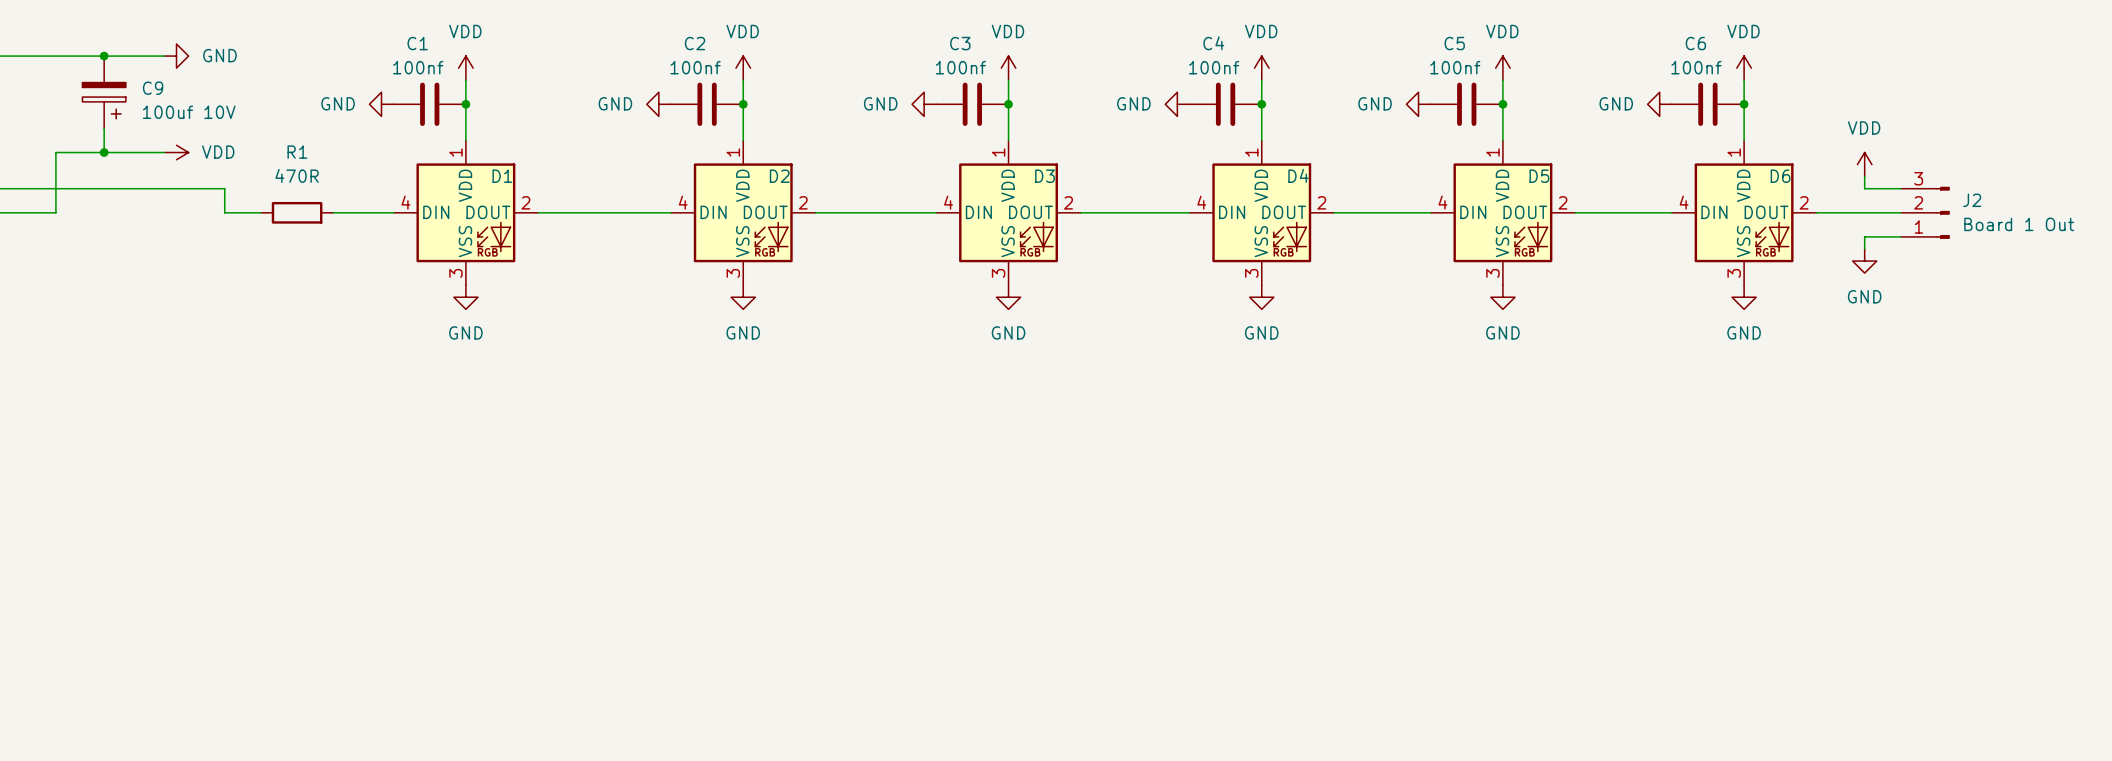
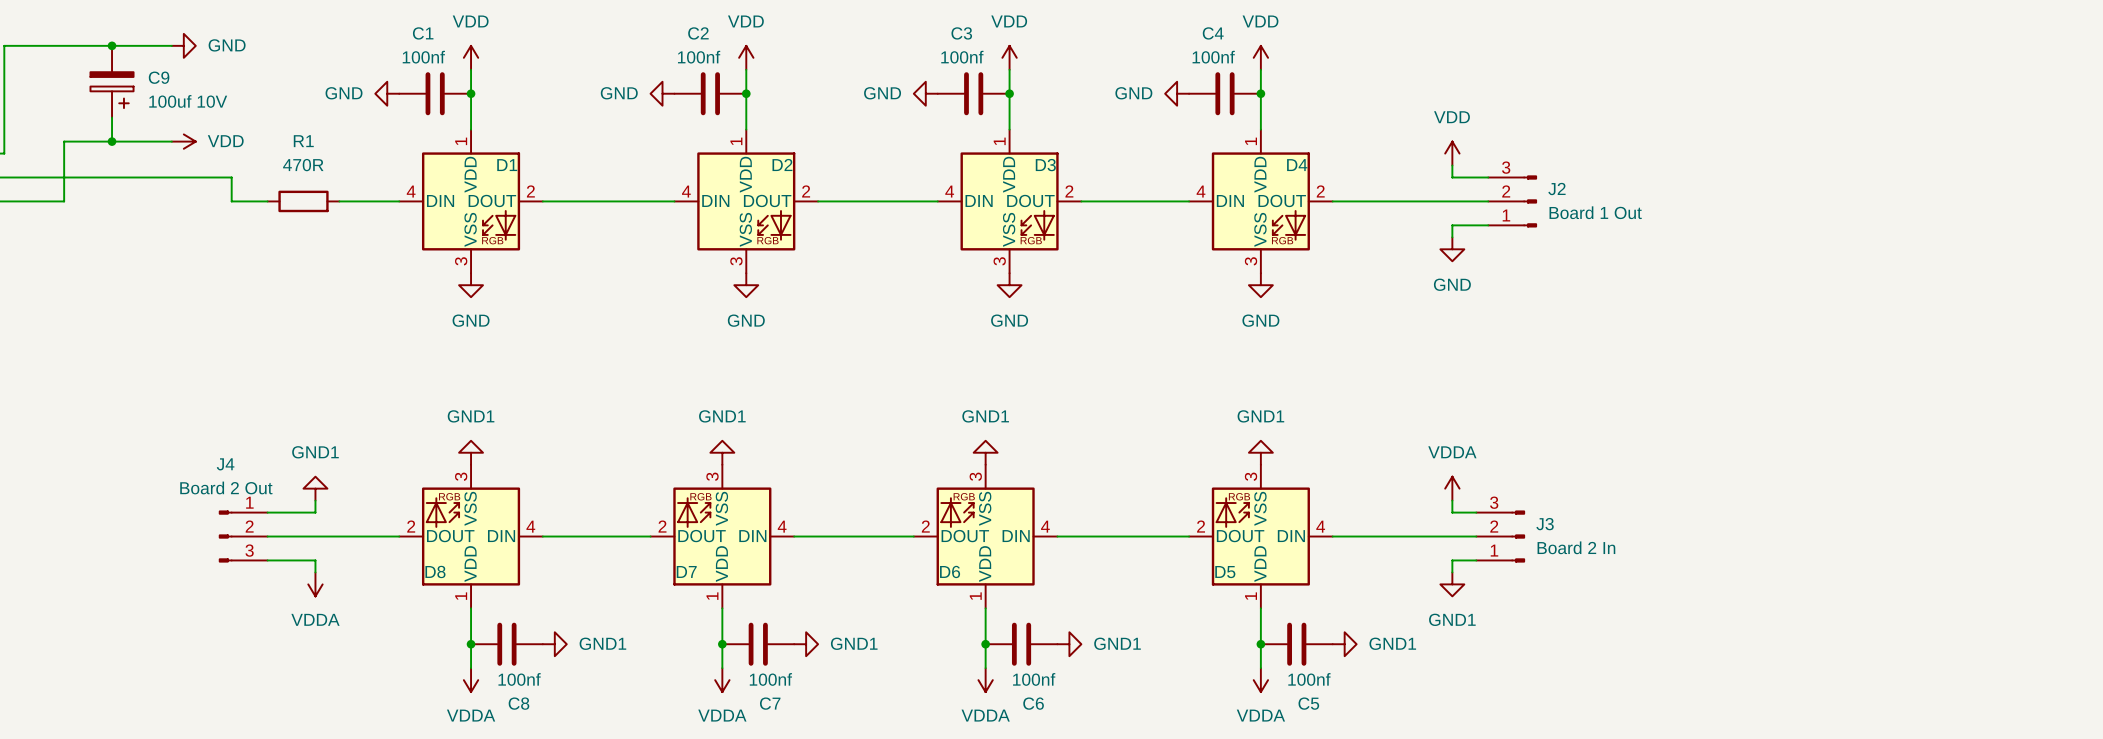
C5 name position: C5 (1454, 43) -> C5 (1308, 703)
C6 name position: C6 (1695, 43) -> C6 (1033, 703)
C5 value position: 100nf (1455, 67) -> 100nf (1309, 679)
C6 value position: 100nf (1696, 67) -> 100nf (1034, 679)
power symbol position: VDD (1502, 68) -> VDD (1452, 153)
power symbol: VDD (1744, 68) -> none
wire: (1502, 80) (1502, 140) -> none
wire: (1744, 80) (1744, 140) -> none
power symbol: GND (1418, 104) -> none
C5 position: (1466, 104) -> (1296, 644)
junction: (1502, 104) -> none
power symbol: GND (1659, 104) -> none
C6 position: (1707, 104) -> (1021, 644)
junction: (1744, 104) -> none
power symbol: VDD (1864, 164) -> none
wire: (1864, 176) (1864, 188) (1900, 188) -> none
D5 rotation: 0° (1502, 212) -> 180° (1260, 536)
D5 position: (1502, 212) -> (1260, 536)
wire: (1575, 212) (1671, 212) -> none
D6 rotation: 0° (1744, 212) -> 180° (985, 536)
D6 position: (1744, 212) -> (985, 536)
wire: (1816, 212) (1900, 212) -> none
J2 position: (1925, 212) -> (1512, 201)
wire: (1900, 236) (1864, 236) (1864, 248) -> none
power symbol: GND (1864, 261) -> none
power symbol position: GND (1502, 297) -> GND (1452, 249)
power symbol: GND (1744, 297) -> none
power symbol: none -> GND1 (471, 452)
power symbol: none -> GND1 (722, 452)
power symbol: none -> GND1 (985, 452)
power symbol: none -> GND1 (1260, 452)
power symbol: none -> GND1 (315, 488)
power symbol: none -> VDDA (1452, 488)
wire: none -> (315, 500) (315, 512) (267, 512)
wire: none -> (1452, 500) (1452, 512) (1476, 512)
J4: none -> Board 2 Out (243, 536)
wire: none -> (267, 536) (399, 536)
D8: none -> (471, 536)
wire: none -> (542, 536) (650, 536)
D7: none -> (722, 536)
wire: none -> (794, 536) (913, 536)
wire: none -> (1057, 536) (1189, 536)
wire: none -> (1332, 536) (1476, 536)
J3: none -> Board 2 In (1500, 536)
wire: none -> (267, 560) (315, 560) (315, 572)
wire: none -> (1476, 560) (1452, 560) (1452, 572)
power symbol: none -> VDDA (315, 584)
power symbol: none -> GND1 (1452, 584)
wire: none -> (471, 608) (471, 668)
wire: none -> (722, 608) (722, 668)
wire: none -> (985, 608) (985, 668)
wire: none -> (1260, 608) (1260, 668)
junction: none -> (471, 644)
C8: none -> 100nf (506, 644)
power symbol: none -> GND1 (554, 644)
junction: none -> (722, 644)
C7: none -> 100nf (758, 644)
power symbol: none -> GND1 (806, 644)
junction: none -> (985, 644)
power symbol: none -> GND1 (1069, 644)
junction: none -> (1260, 644)
power symbol: none -> GND1 (1344, 644)
power symbol: none -> VDDA (471, 680)
power symbol: none -> VDDA (722, 680)
power symbol: none -> VDDA (985, 680)
power symbol: none -> VDDA (1260, 680)

